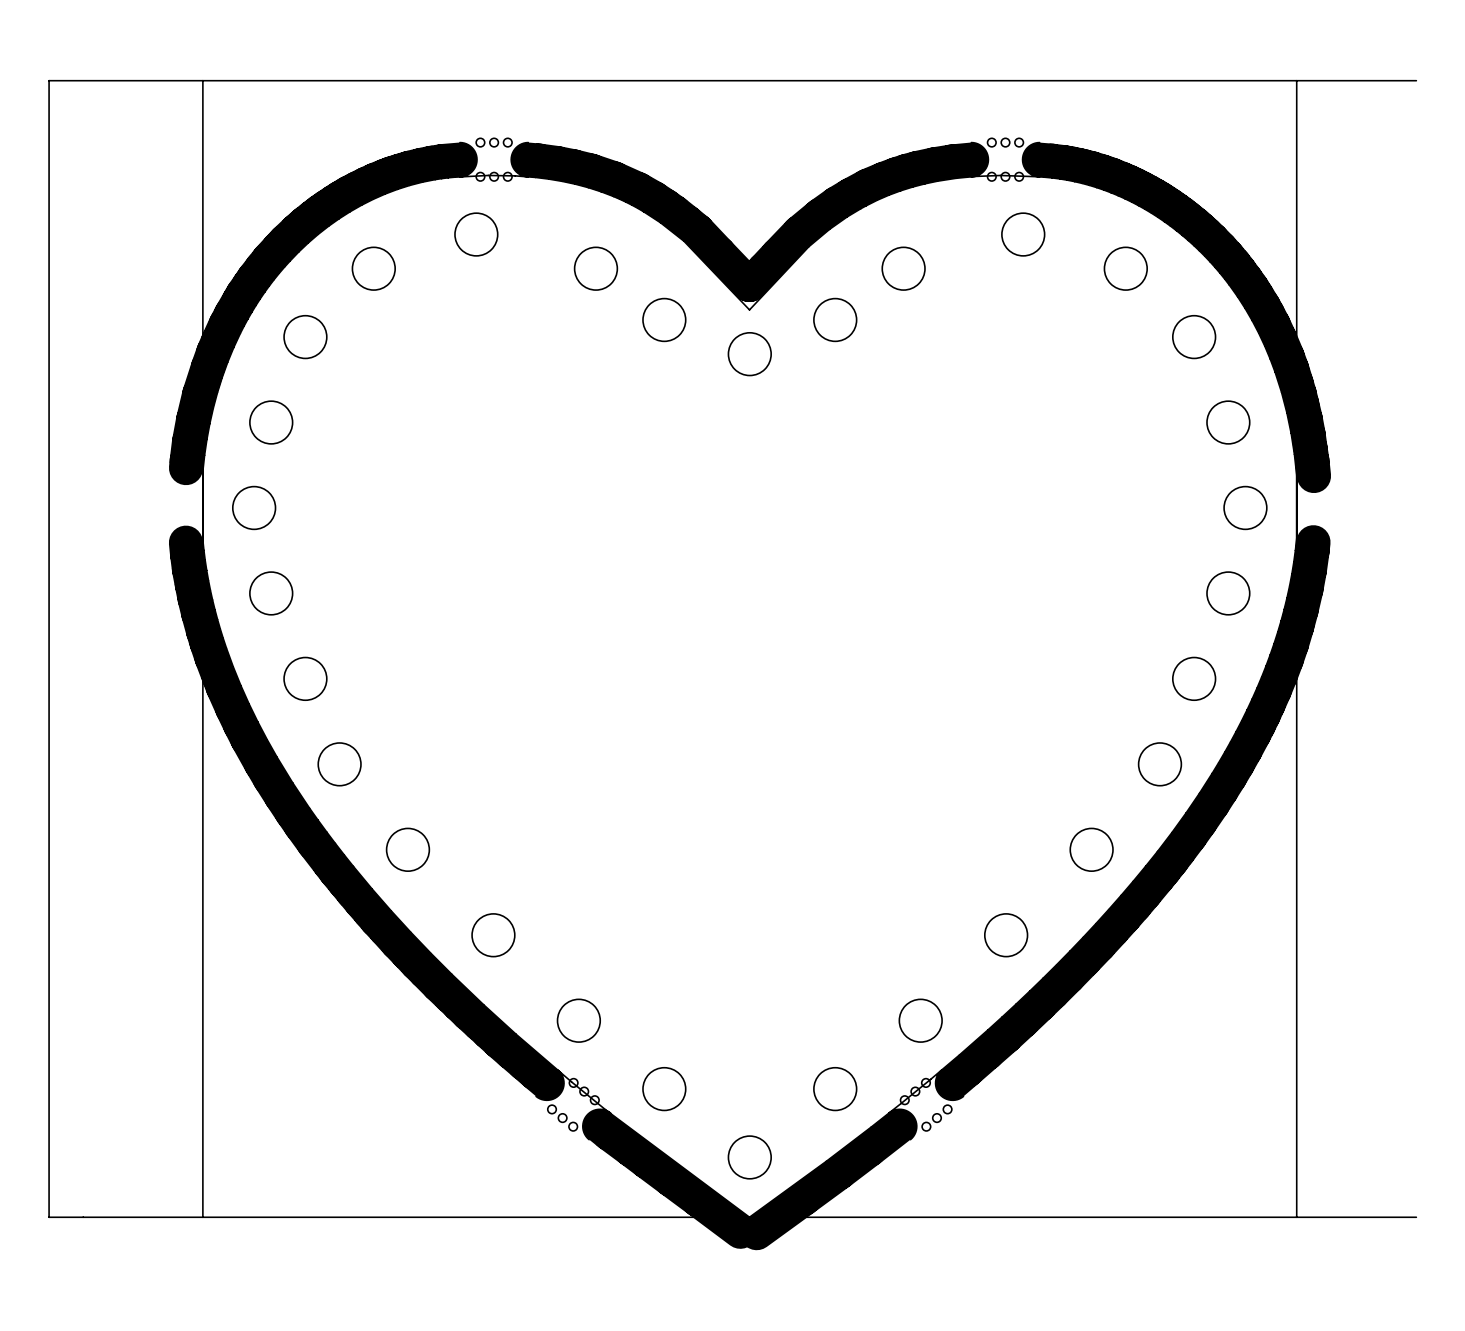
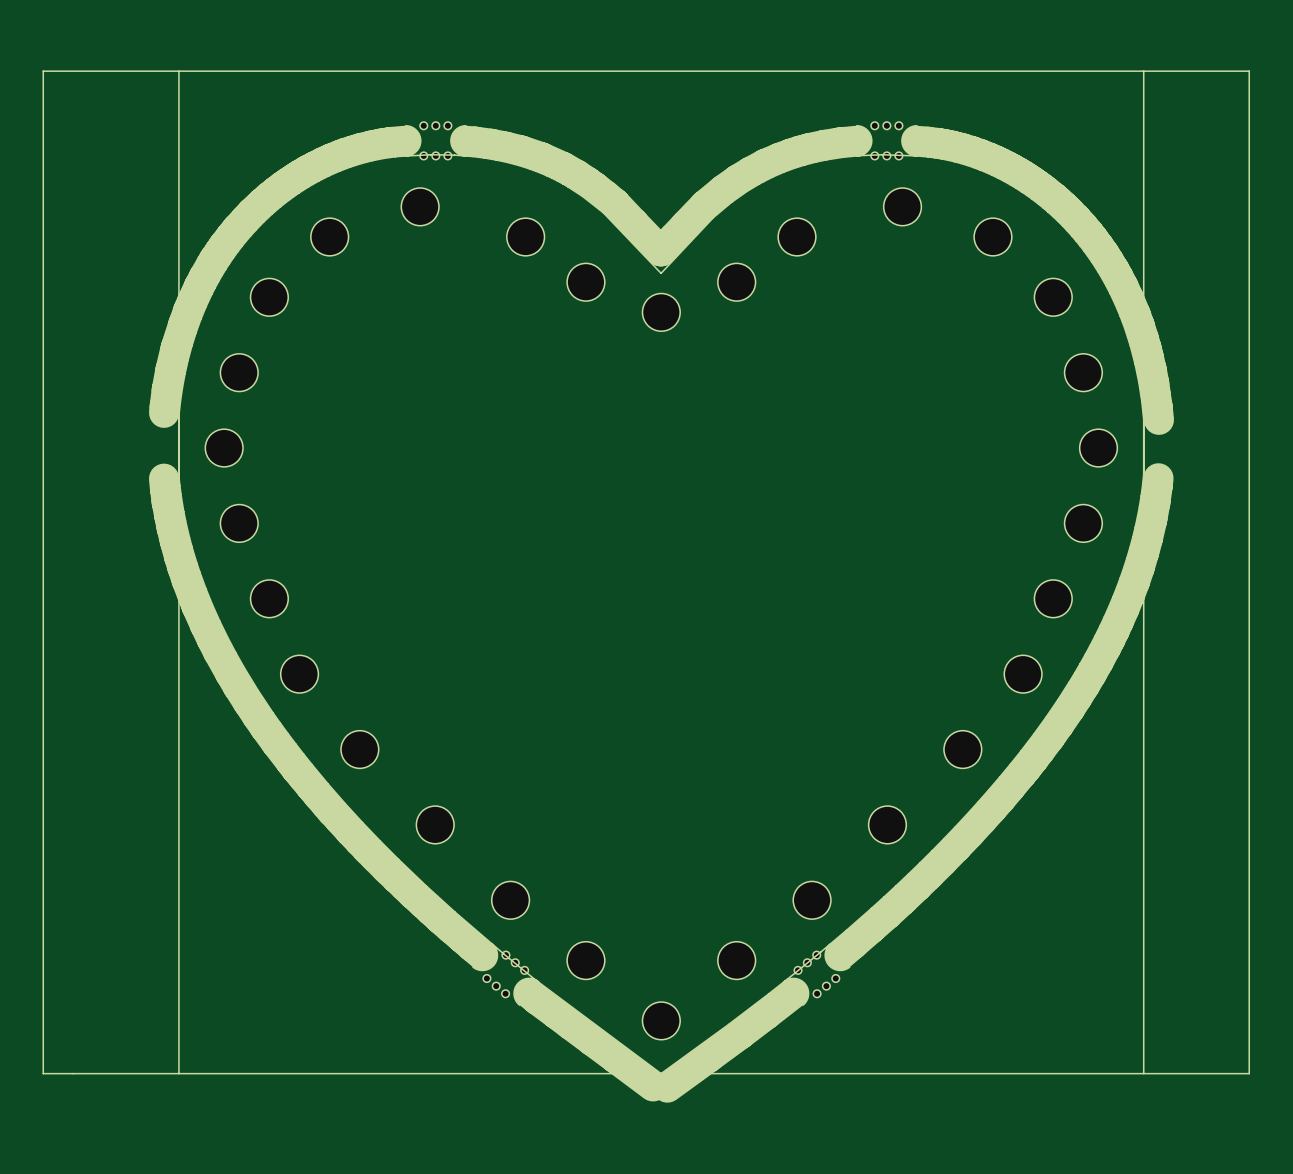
board edge: none -> (1249, 71) (1249, 1073)

